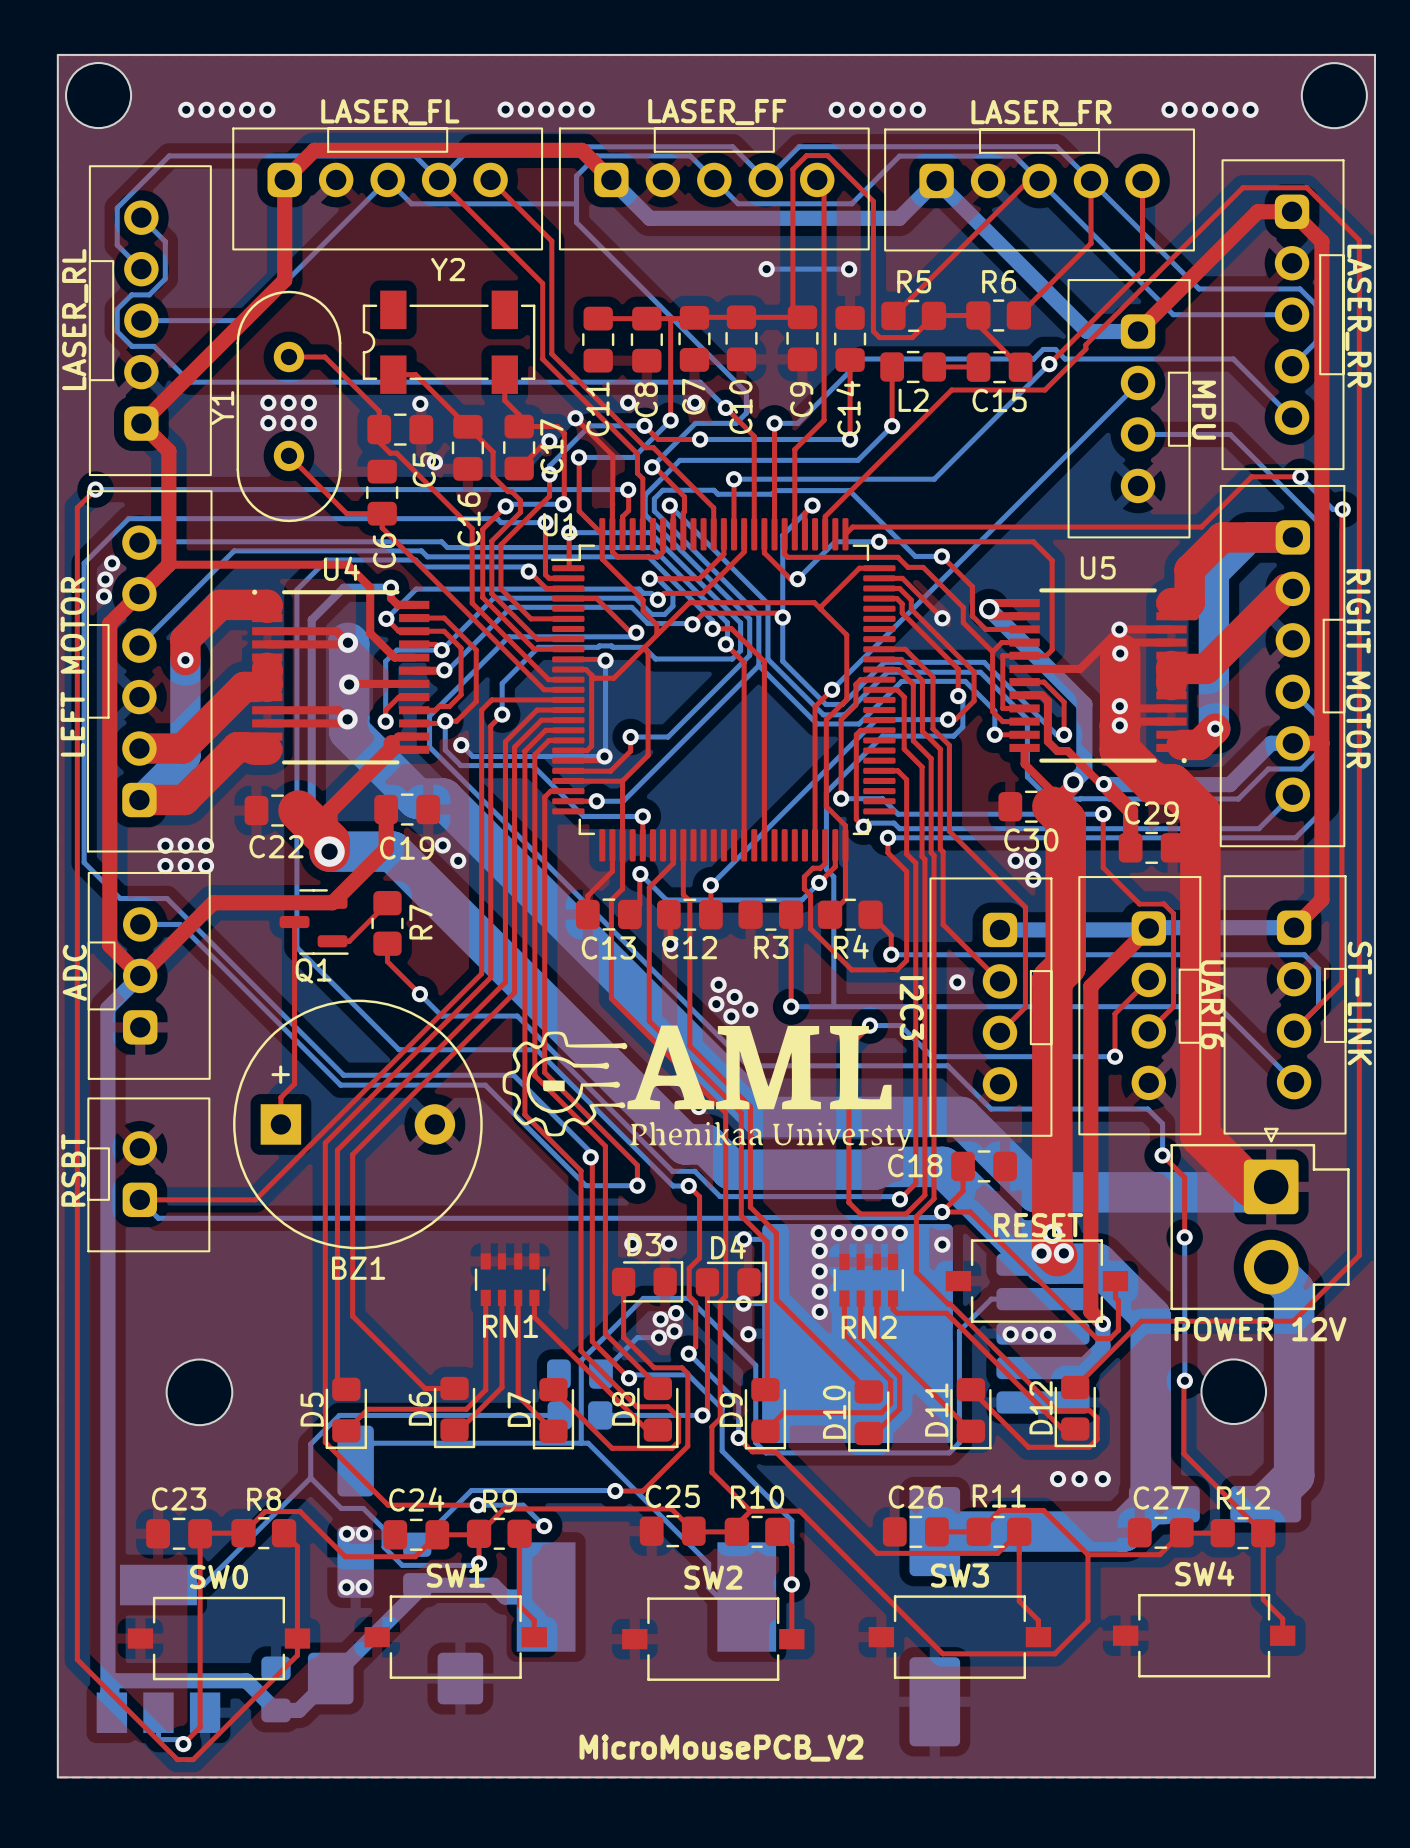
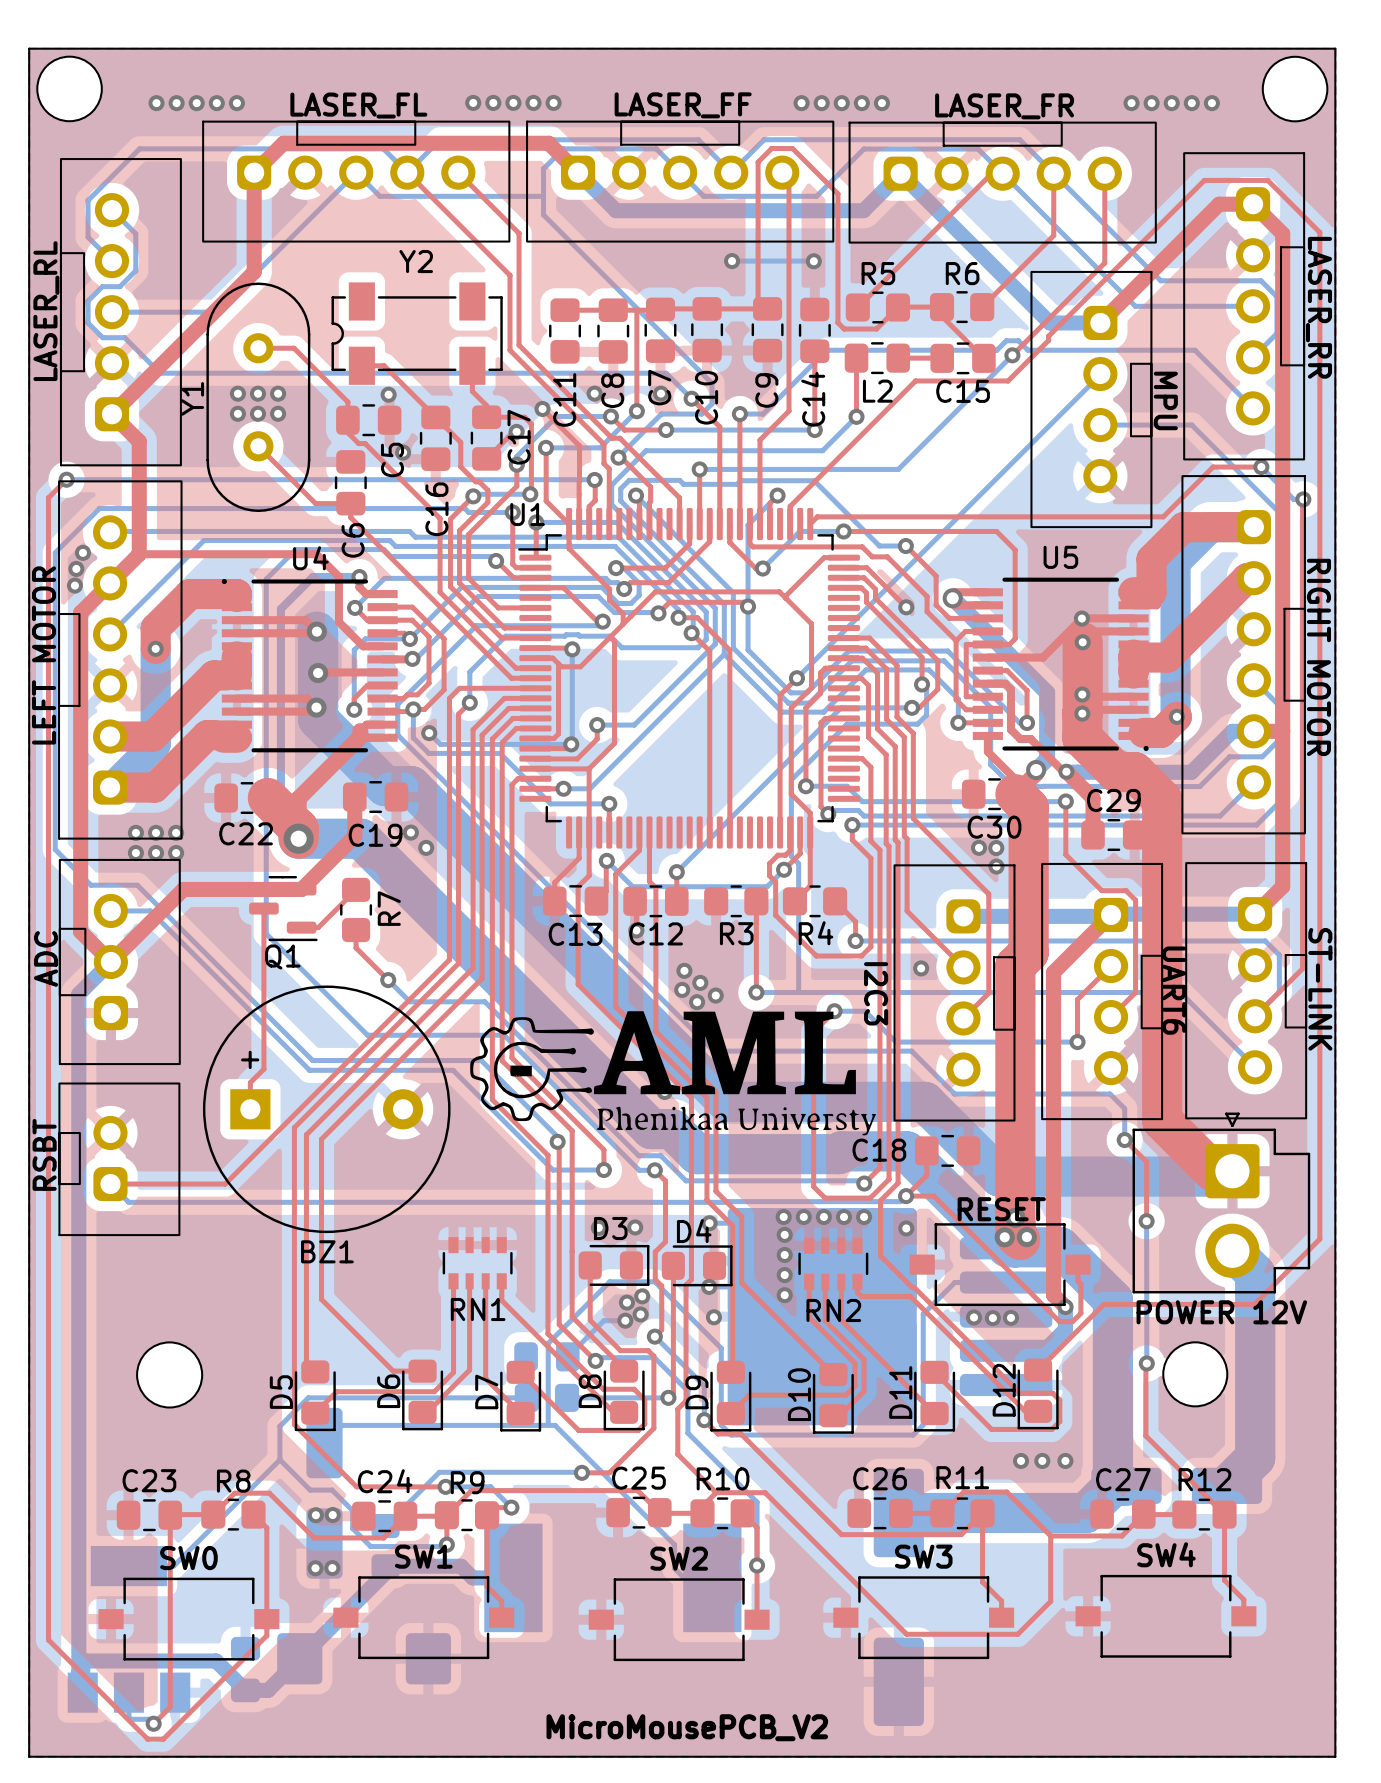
top track: (612, 534) (612, 551) (617, 557) (657, 557) (663, 551) (663, 534) -> none

